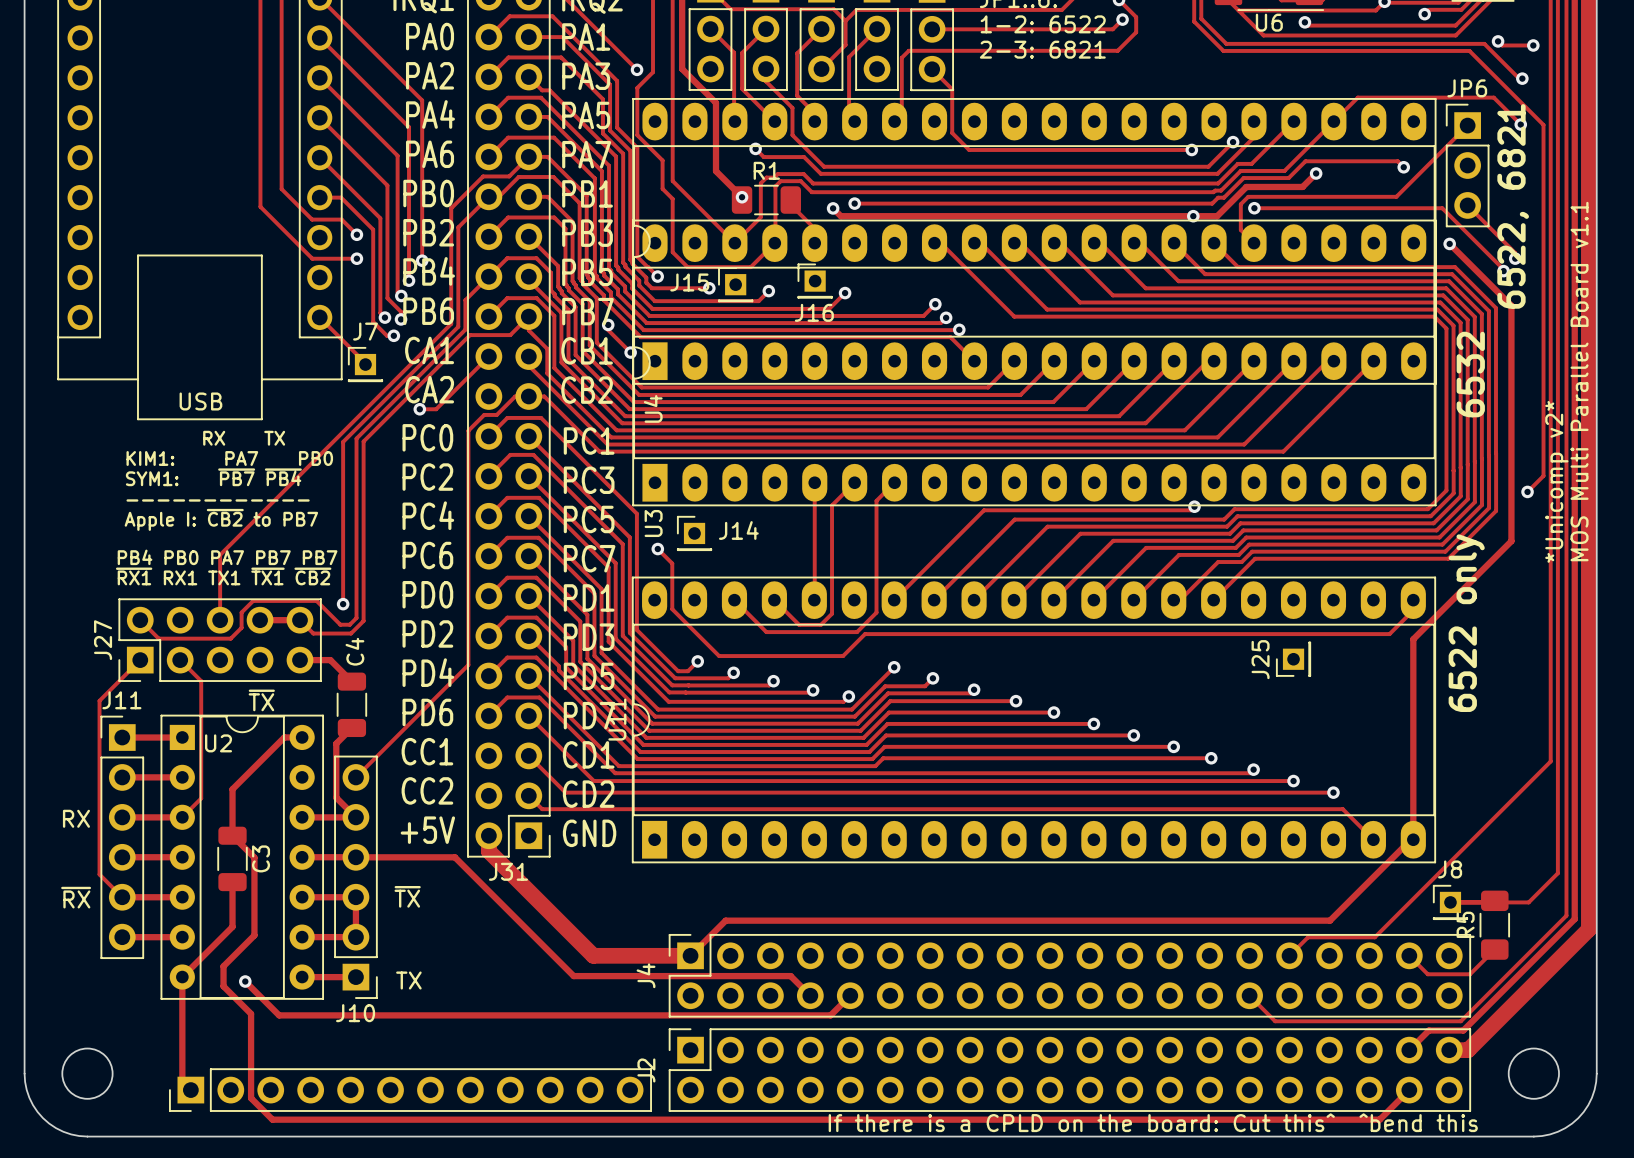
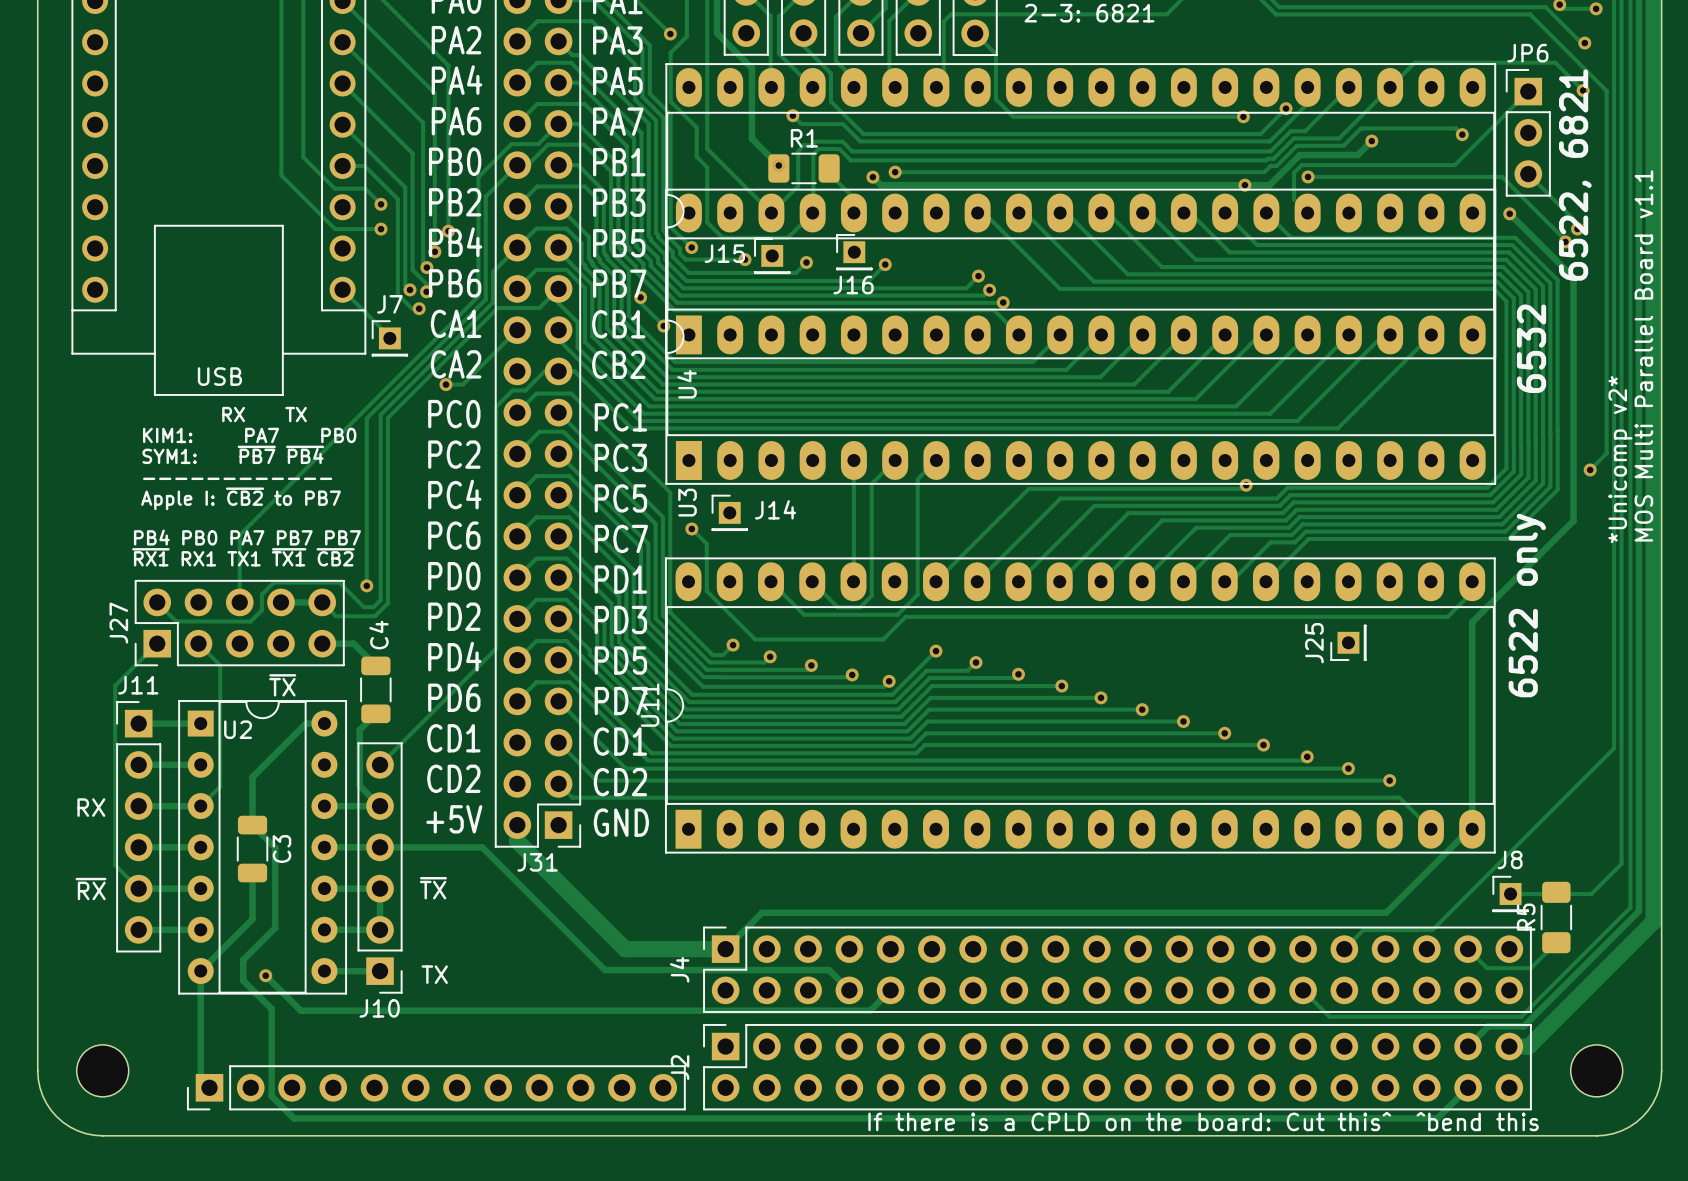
text: CC1 (427, 751) -> CD1 (453, 738)
text: CC2 (427, 790) -> CD2 (453, 778)

